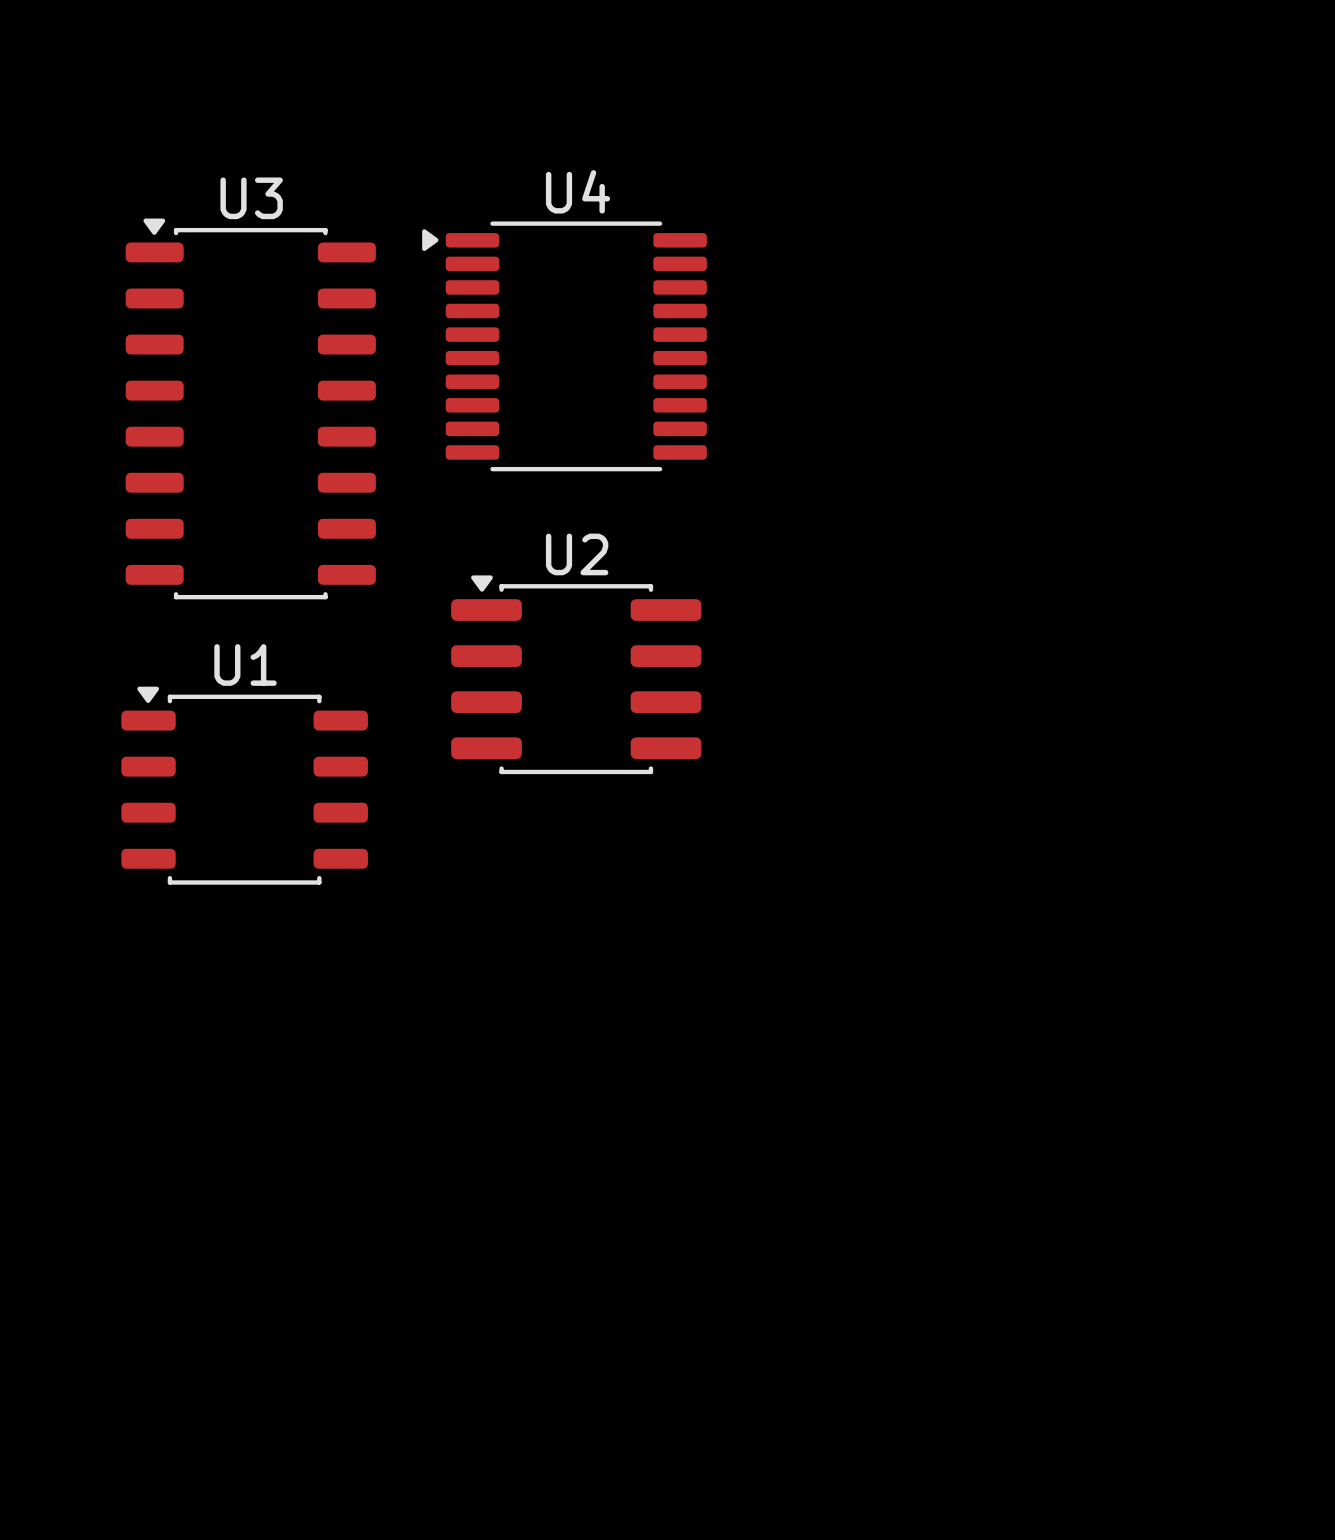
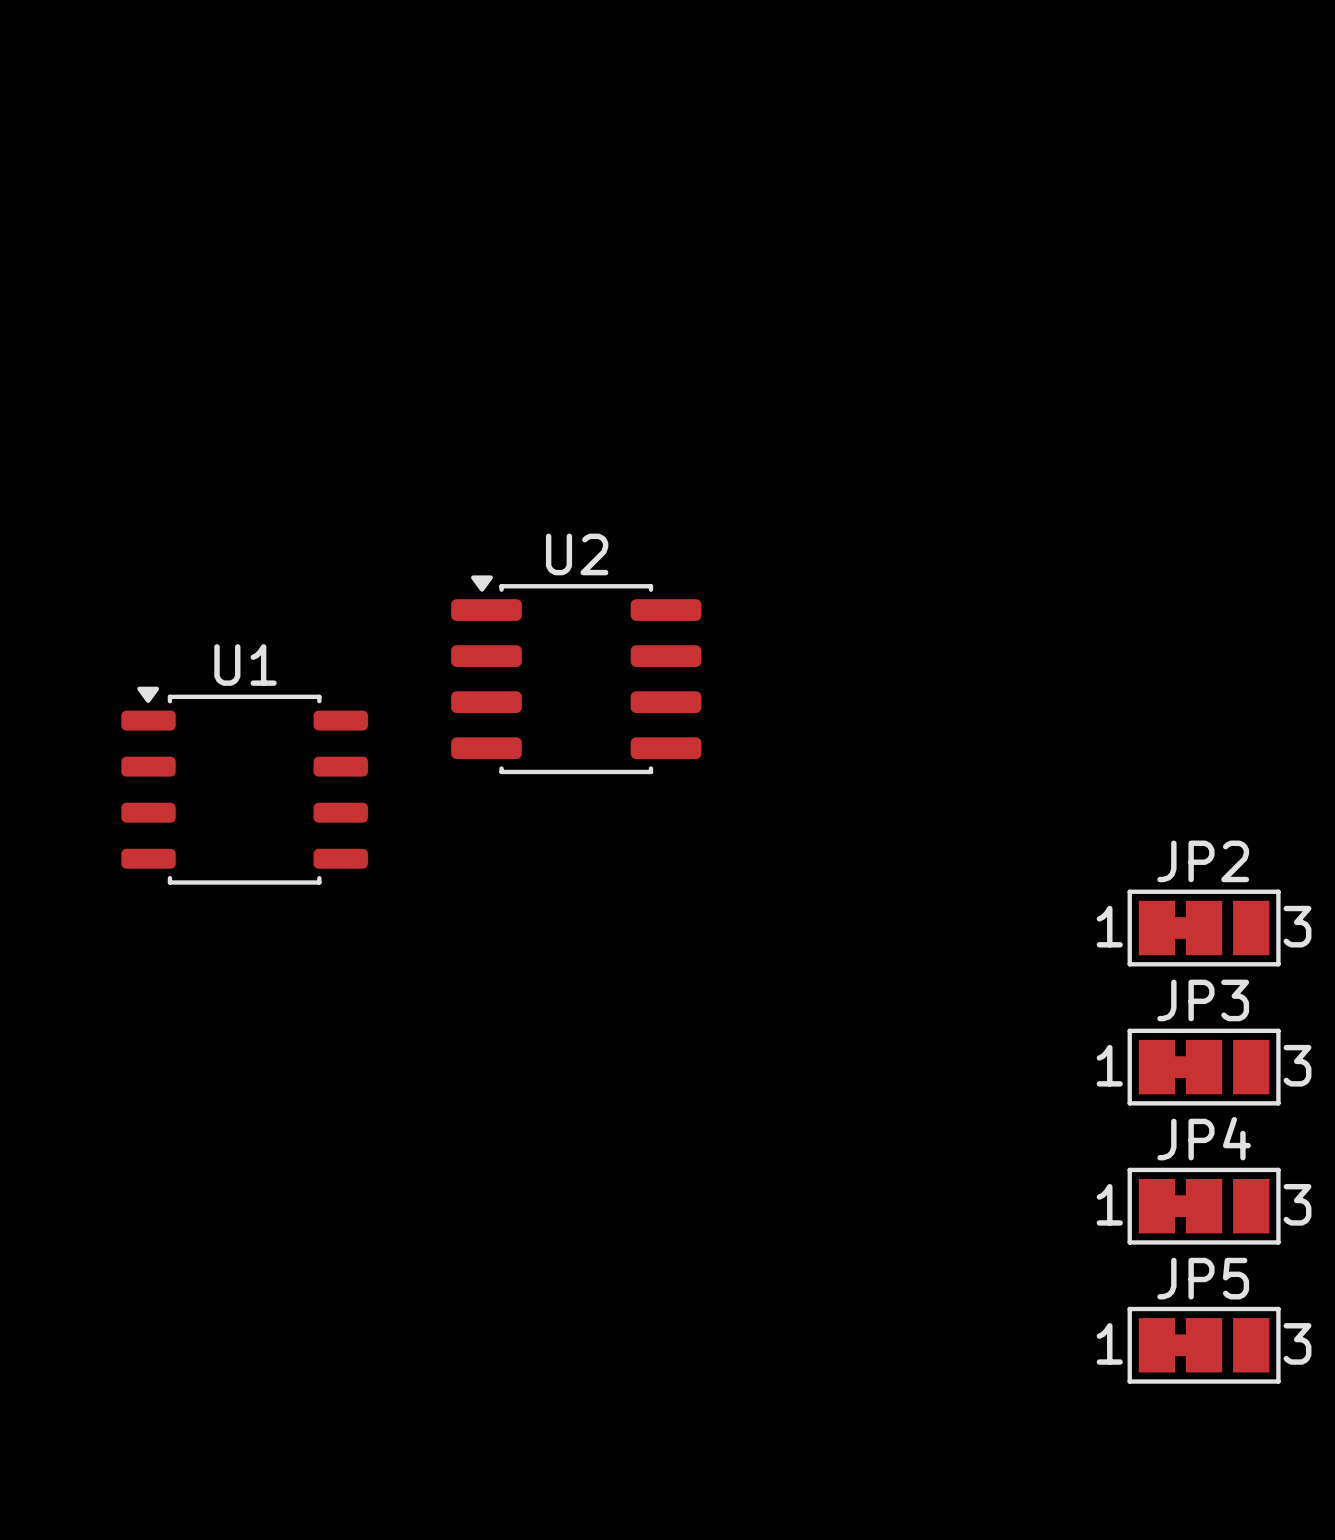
U4: (564, 346) -> none
U3: (250, 408) -> none
JP2: none -> (1204, 928)
JP3: none -> (1204, 1067)
JP4: none -> (1204, 1206)
JP5: none -> (1204, 1345)

